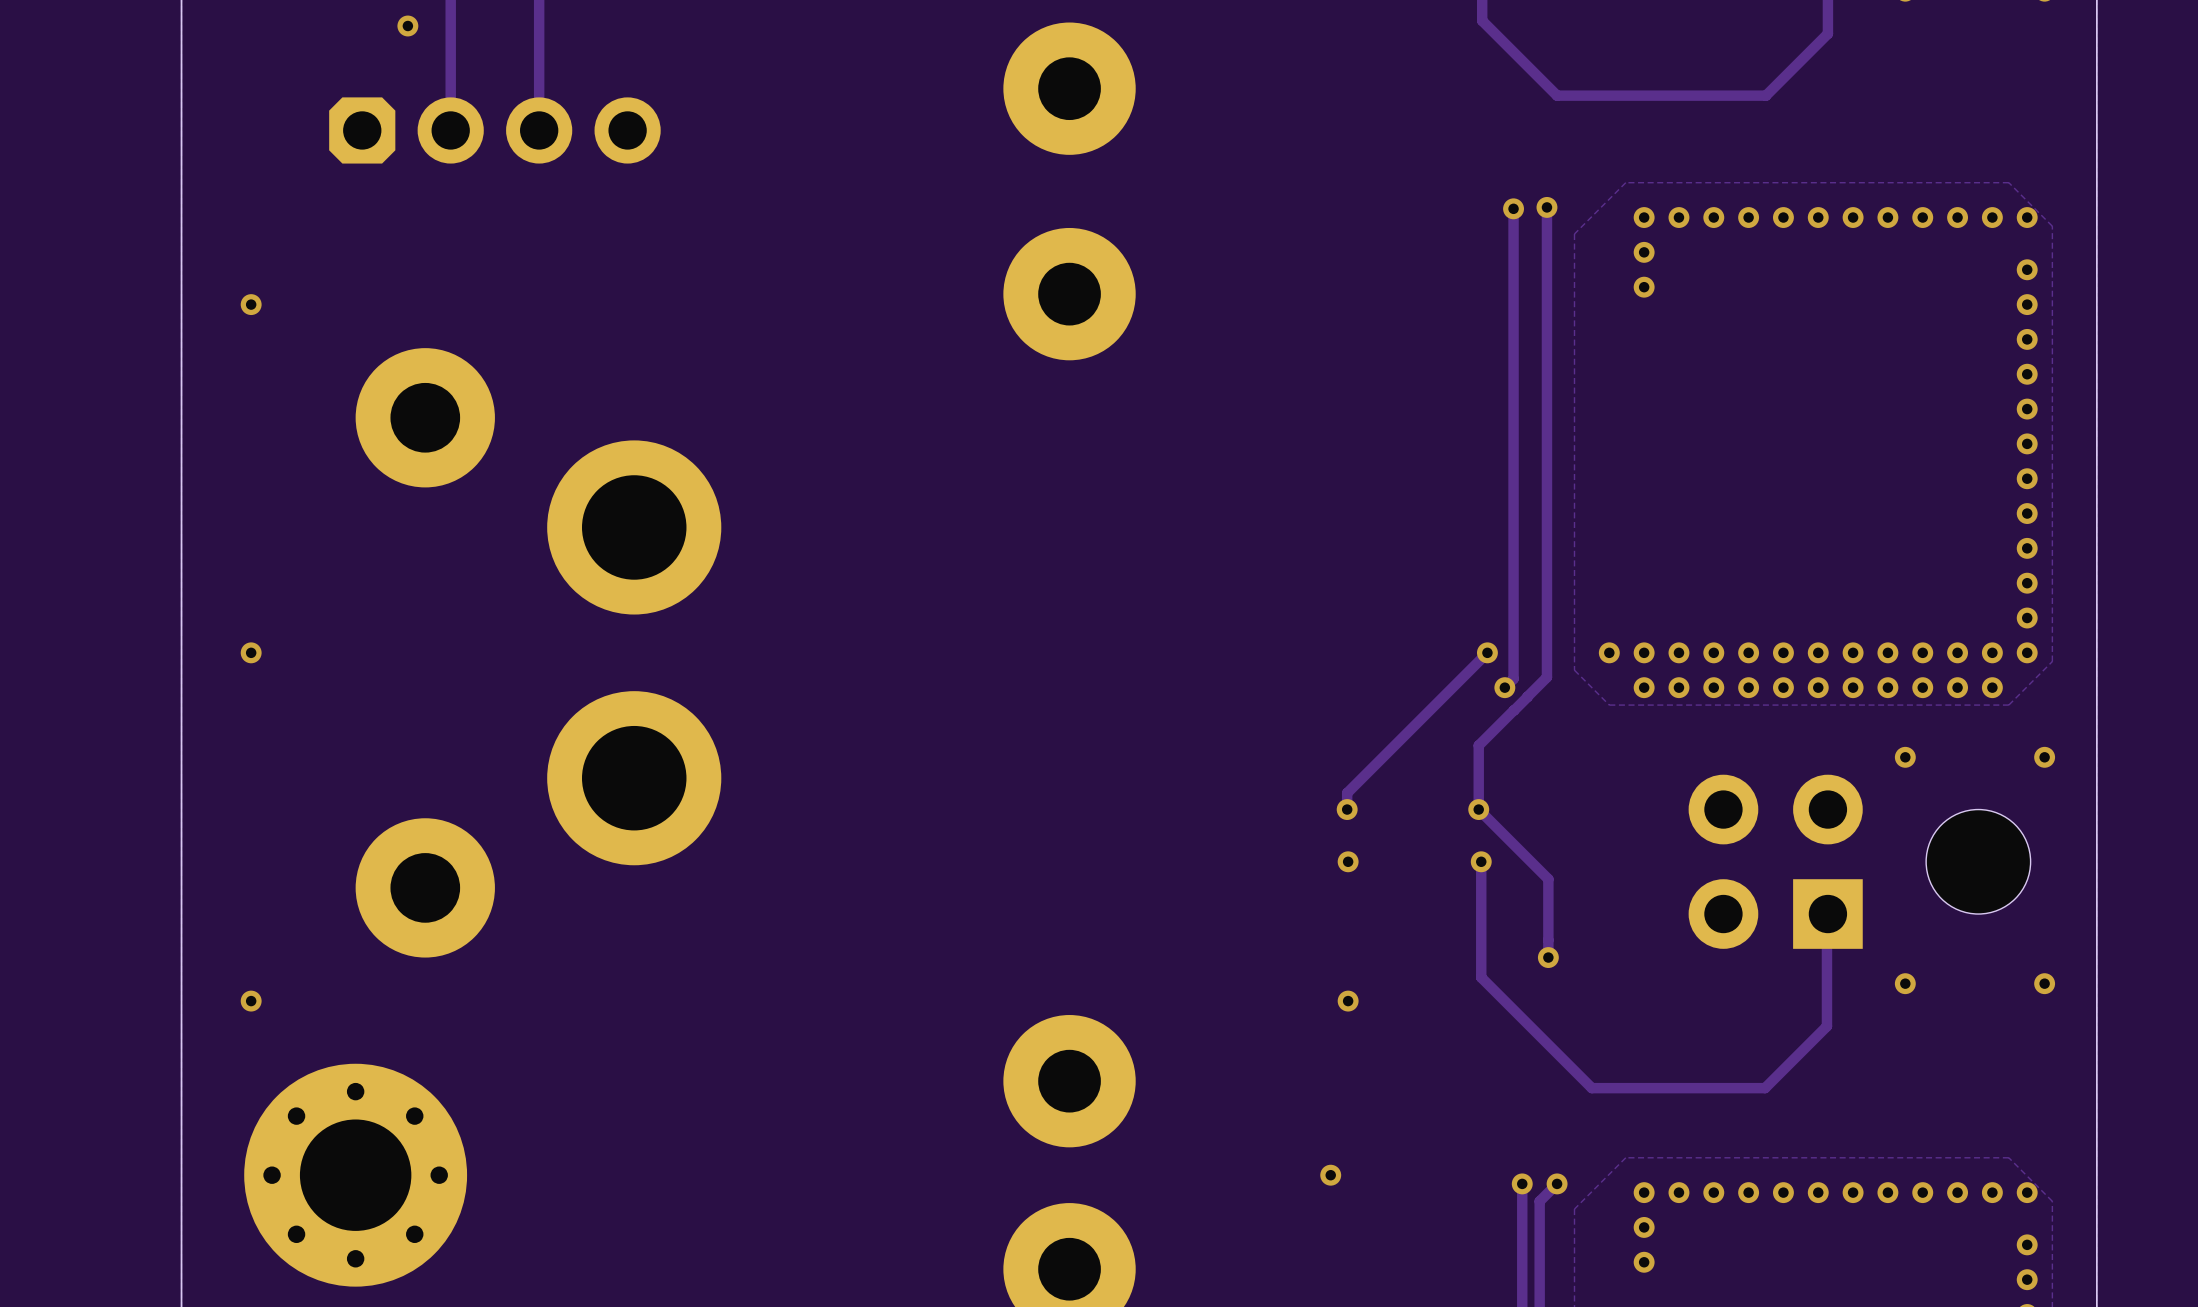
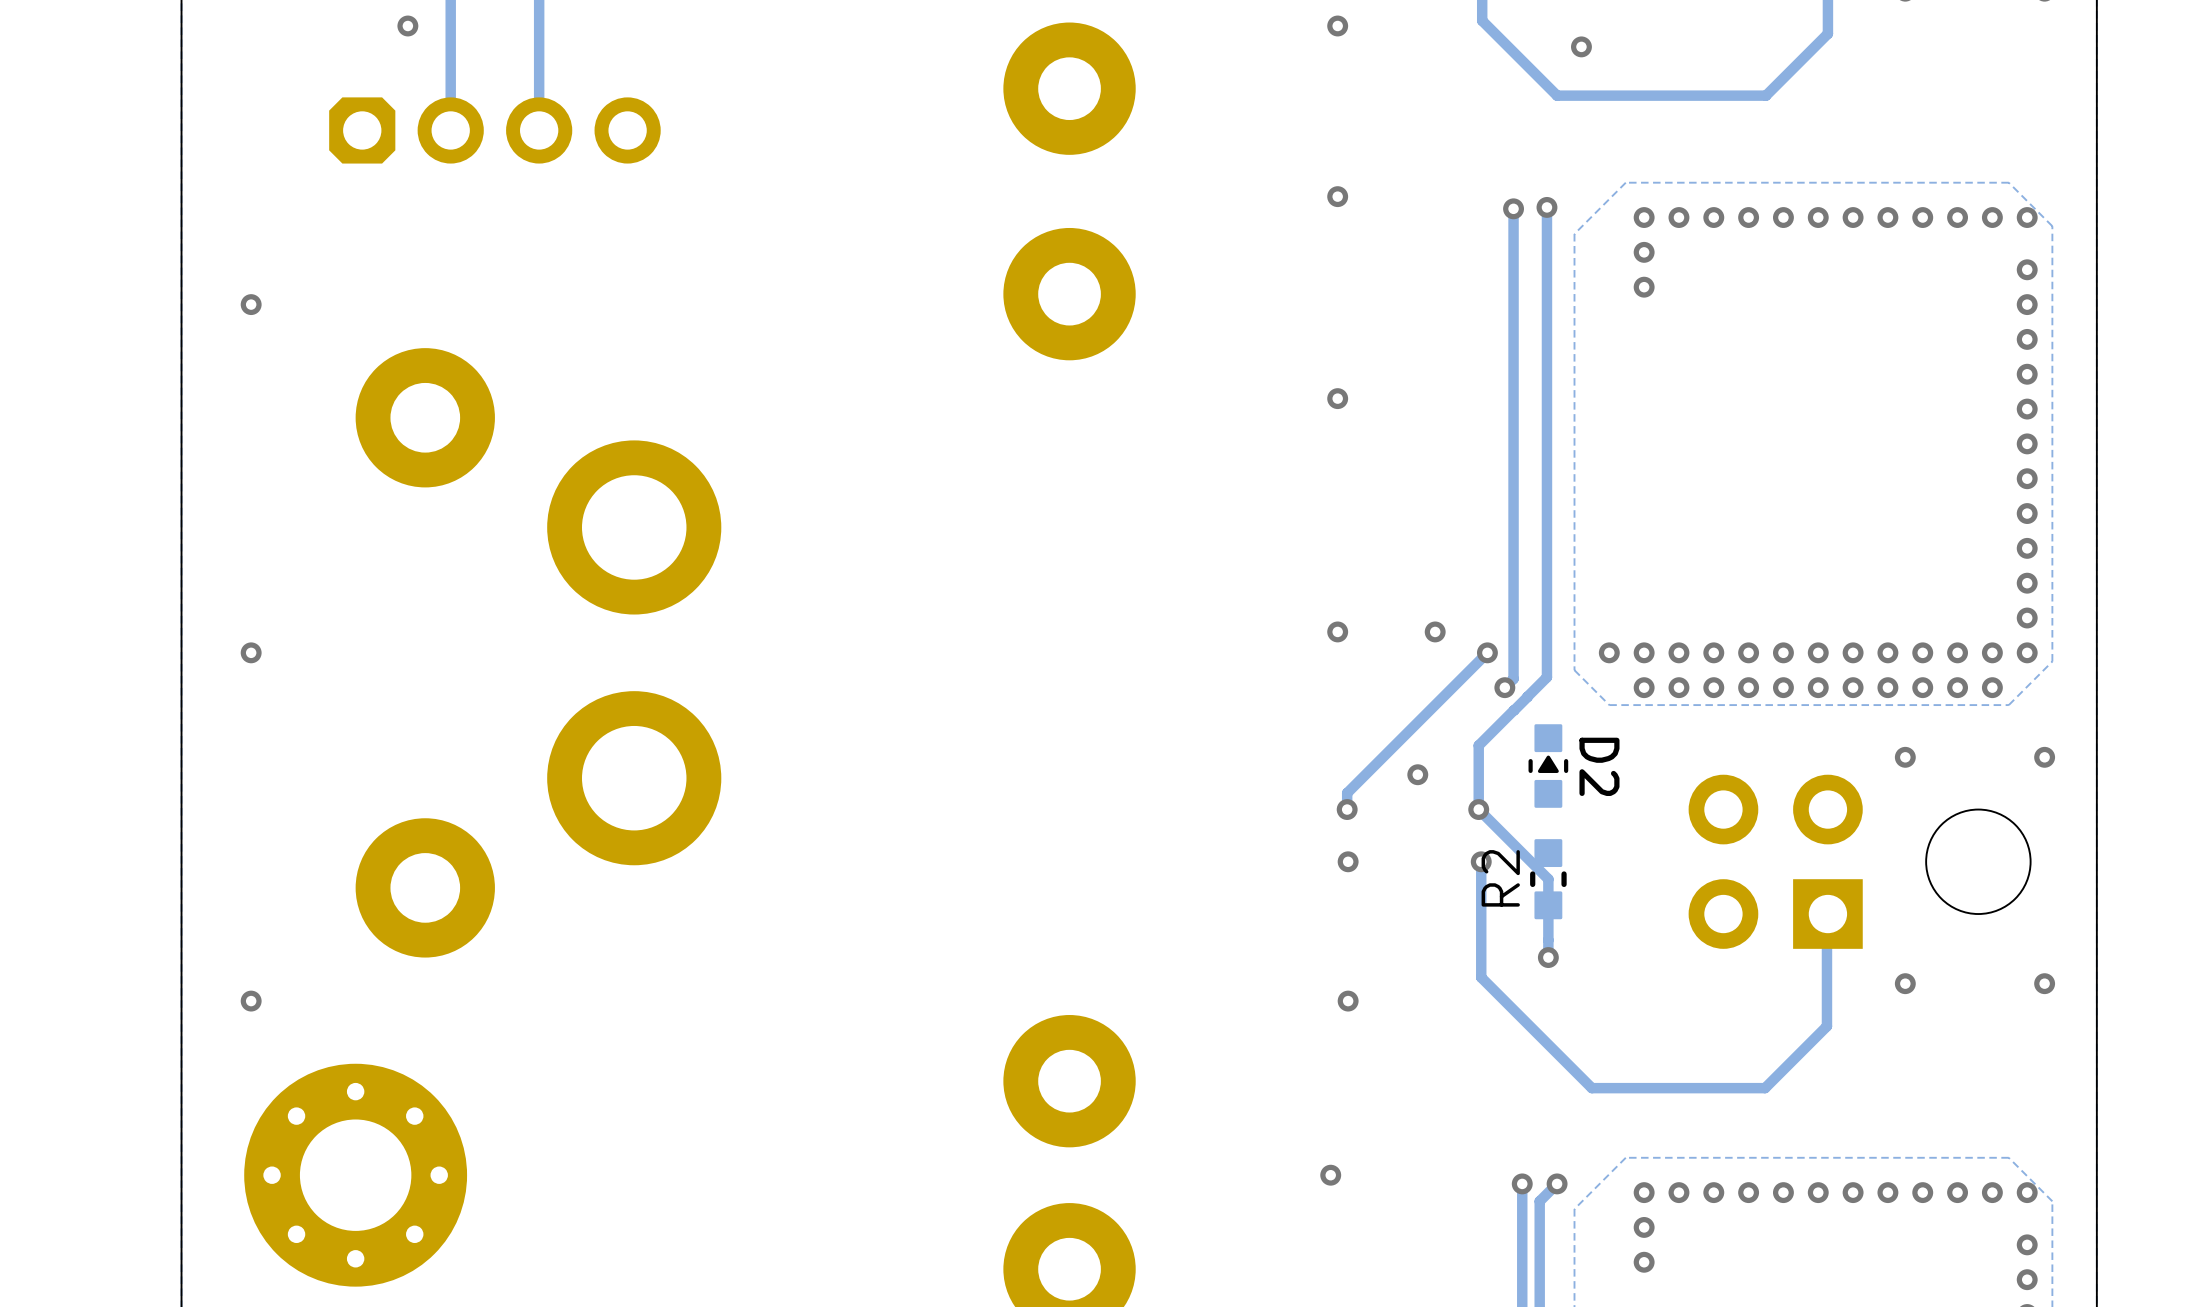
via: none -> (1337, 25)
via: none -> (1581, 46)
via: none -> (1337, 196)
via: none -> (1337, 398)
via: none -> (1337, 631)
via: none -> (1435, 631)
D2: none -> (1548, 766)
via: none -> (1417, 774)
R2: none -> (1548, 879)

